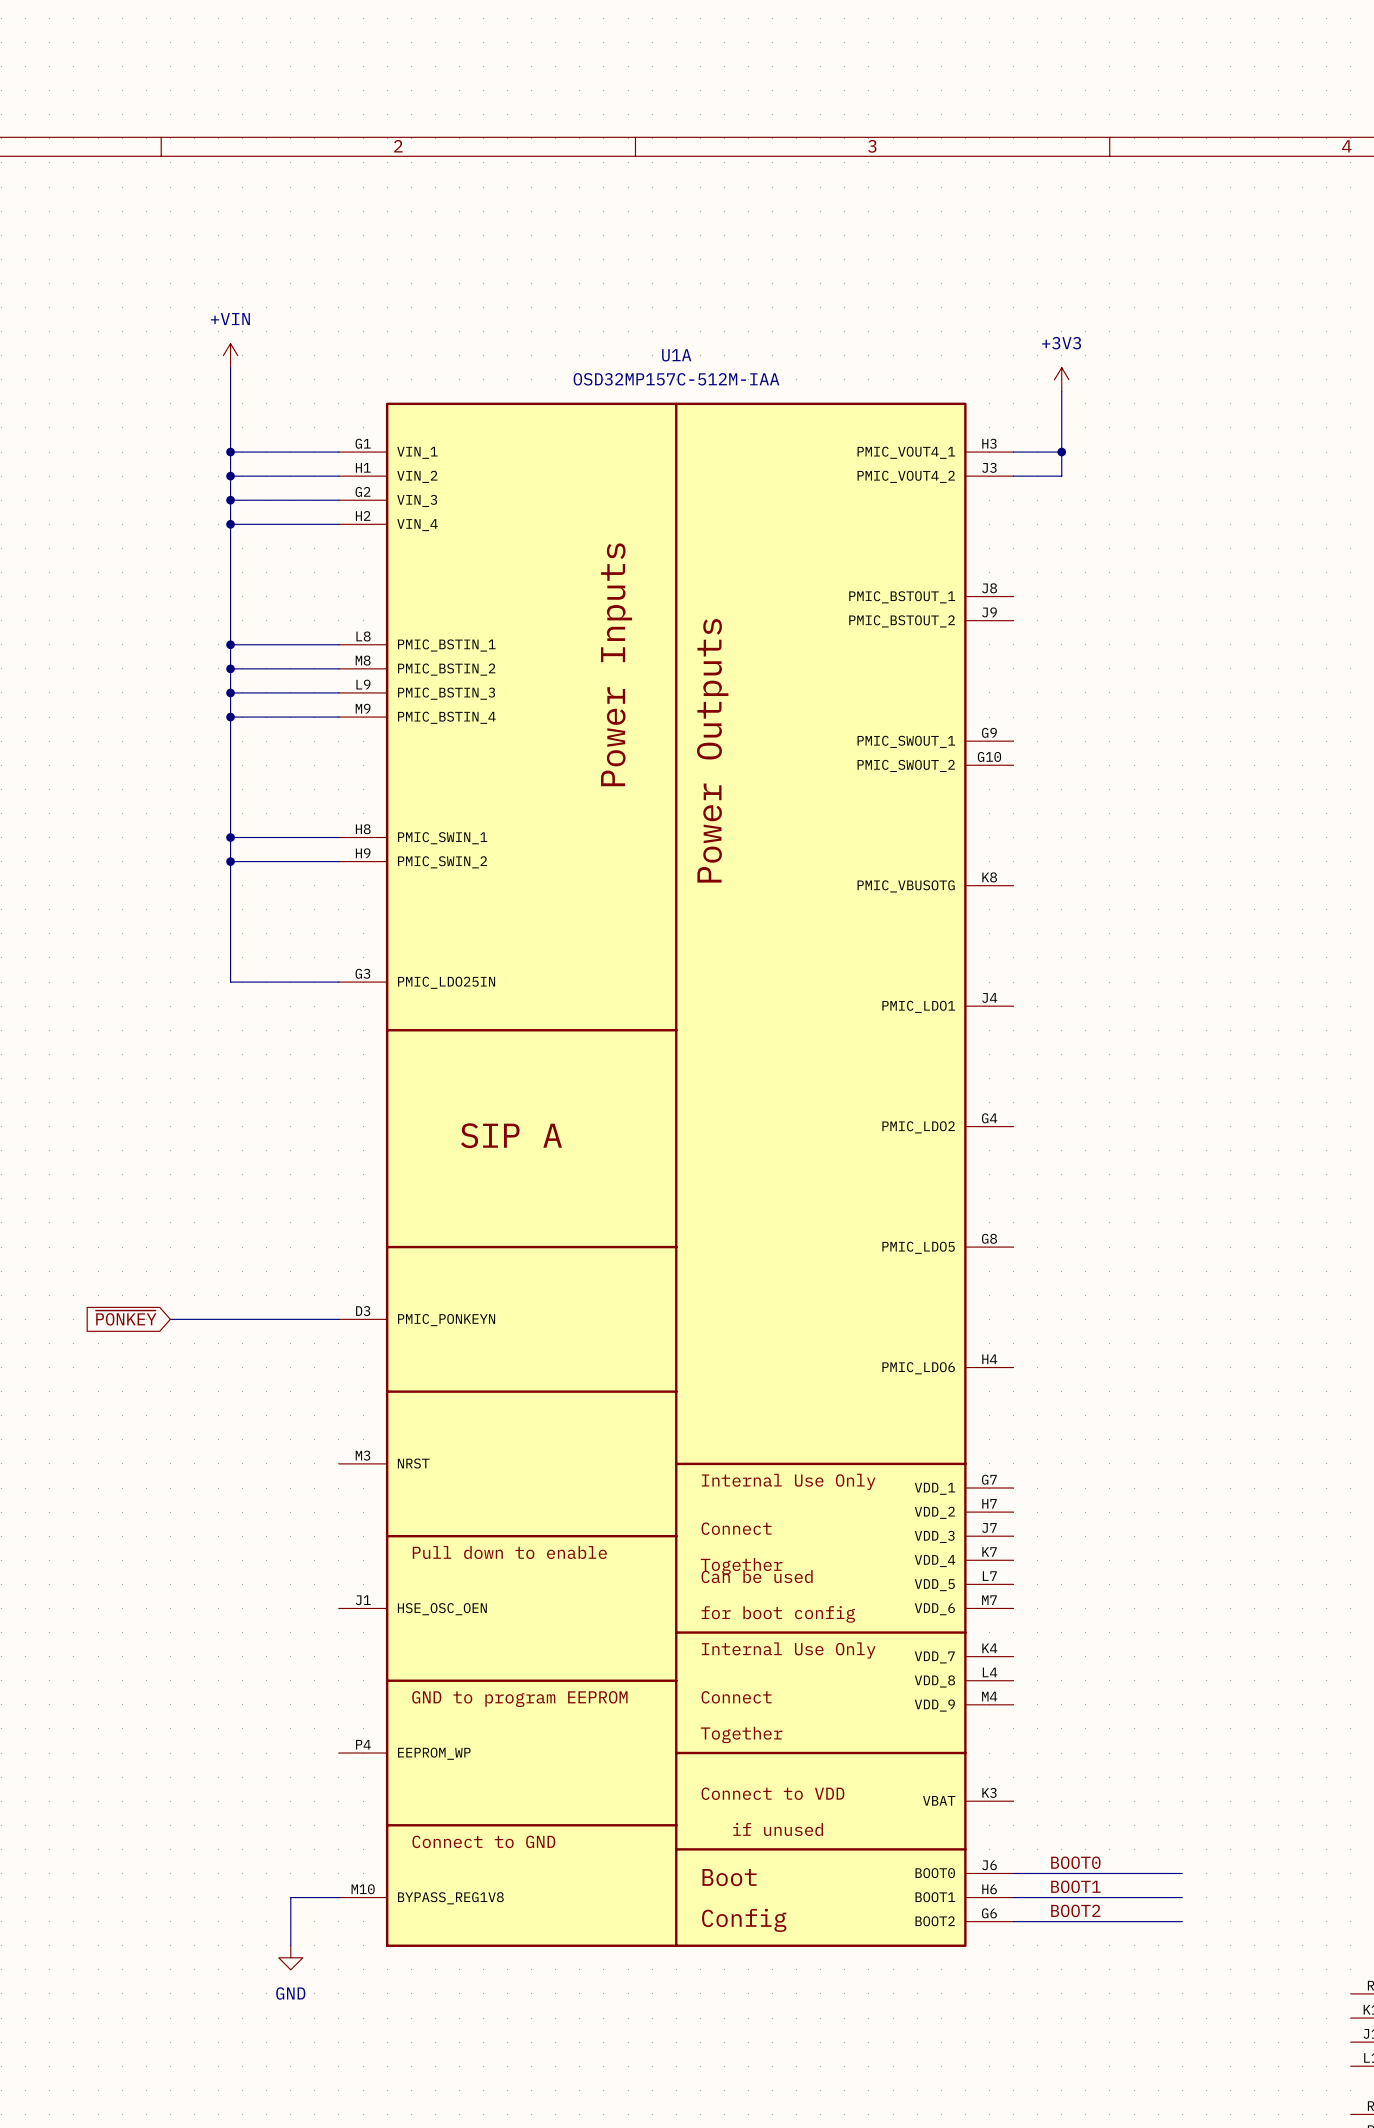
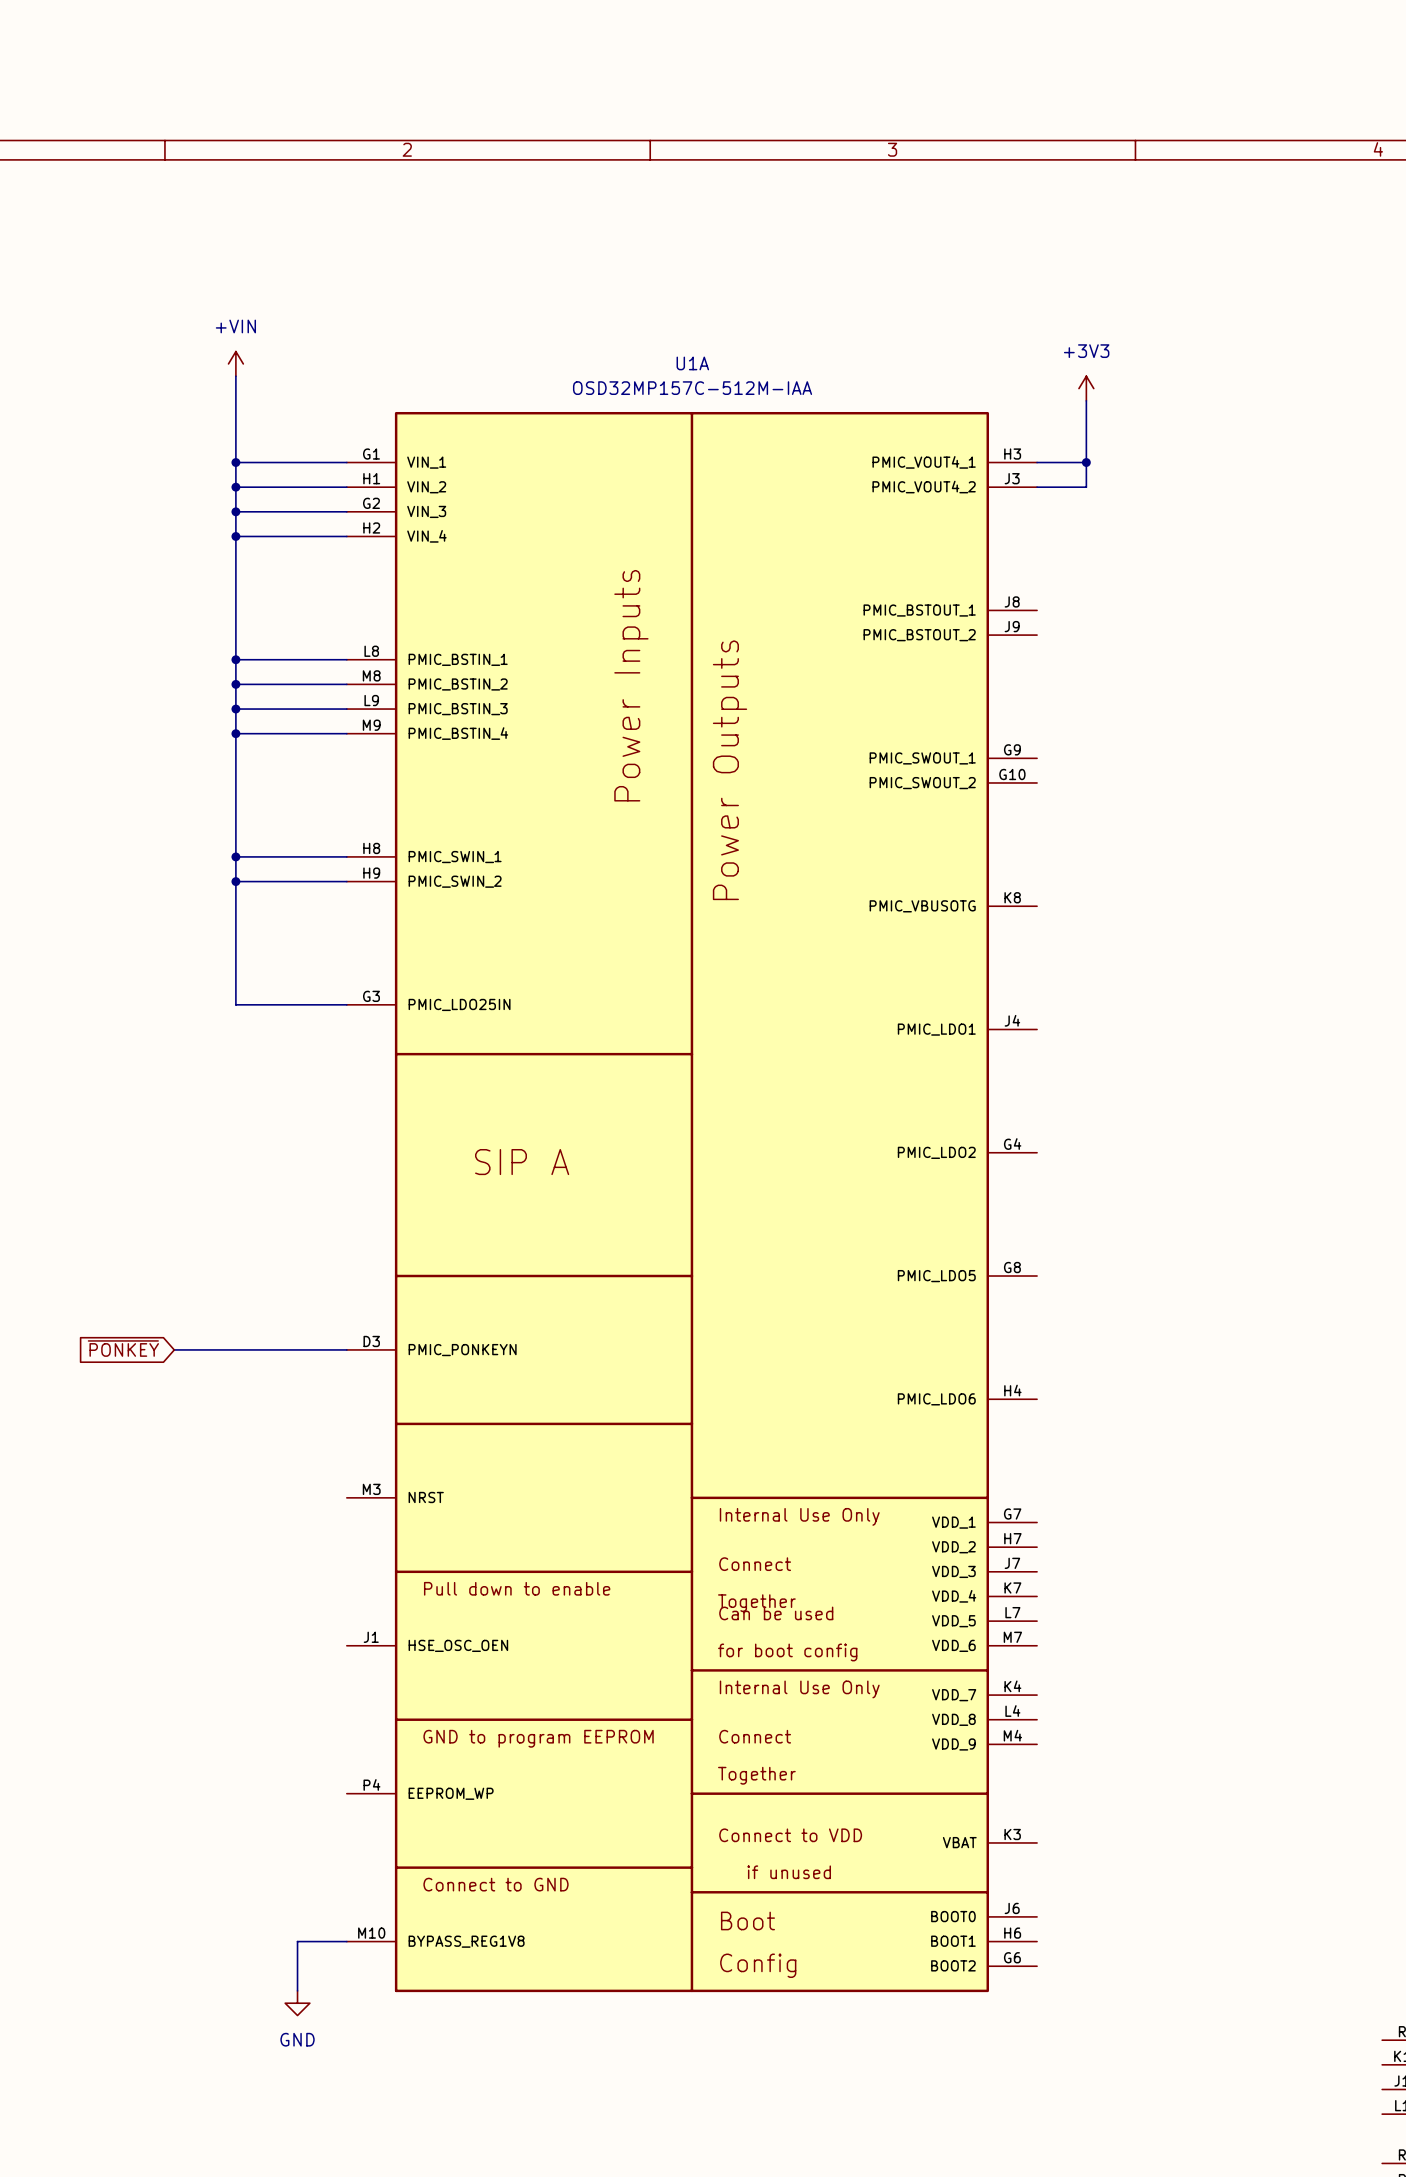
label: BOOT0 (1075, 1862) -> none
wire: (1013, 1873) (1182, 1873) -> none
label: BOOT1 (1075, 1886) -> none
wire: (1013, 1897) (1182, 1897) -> none
label: BOOT2 (1075, 1910) -> none
wire: (1013, 1921) (1182, 1921) -> none

